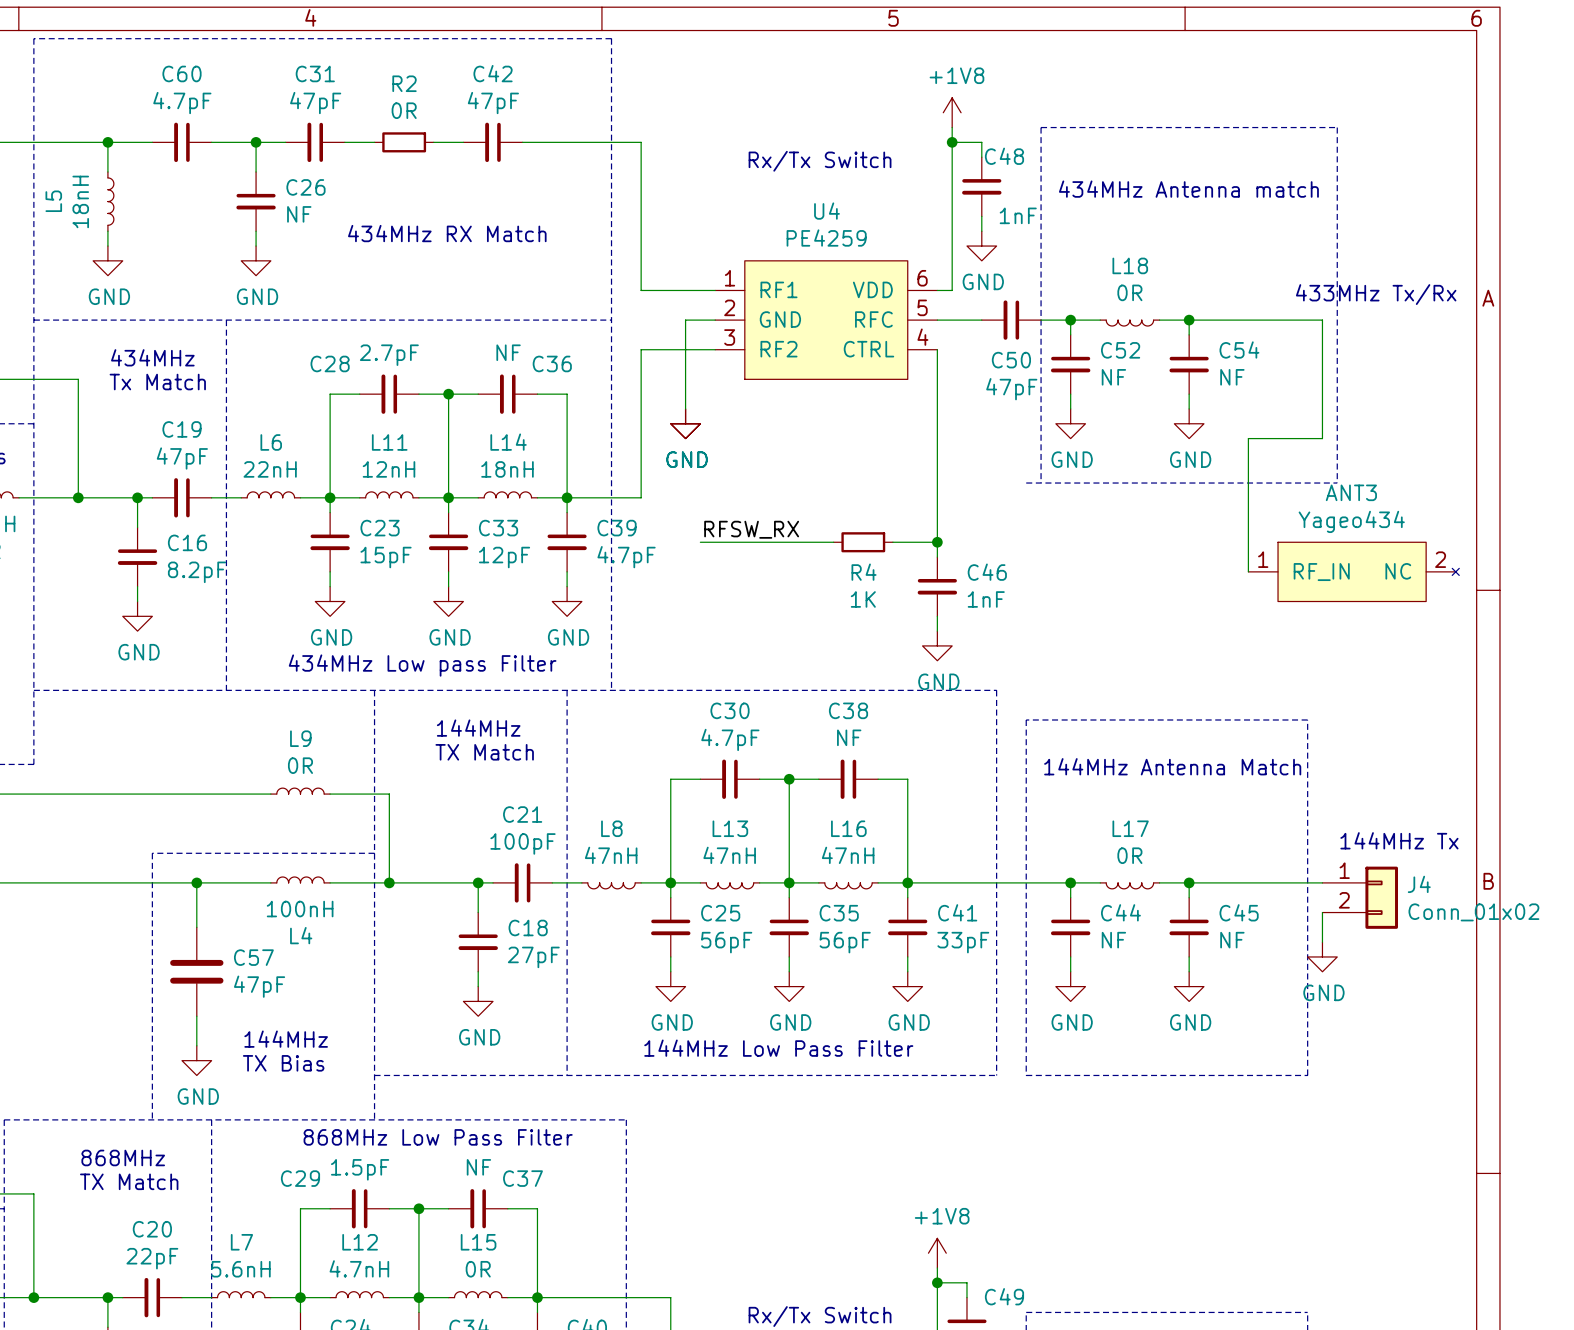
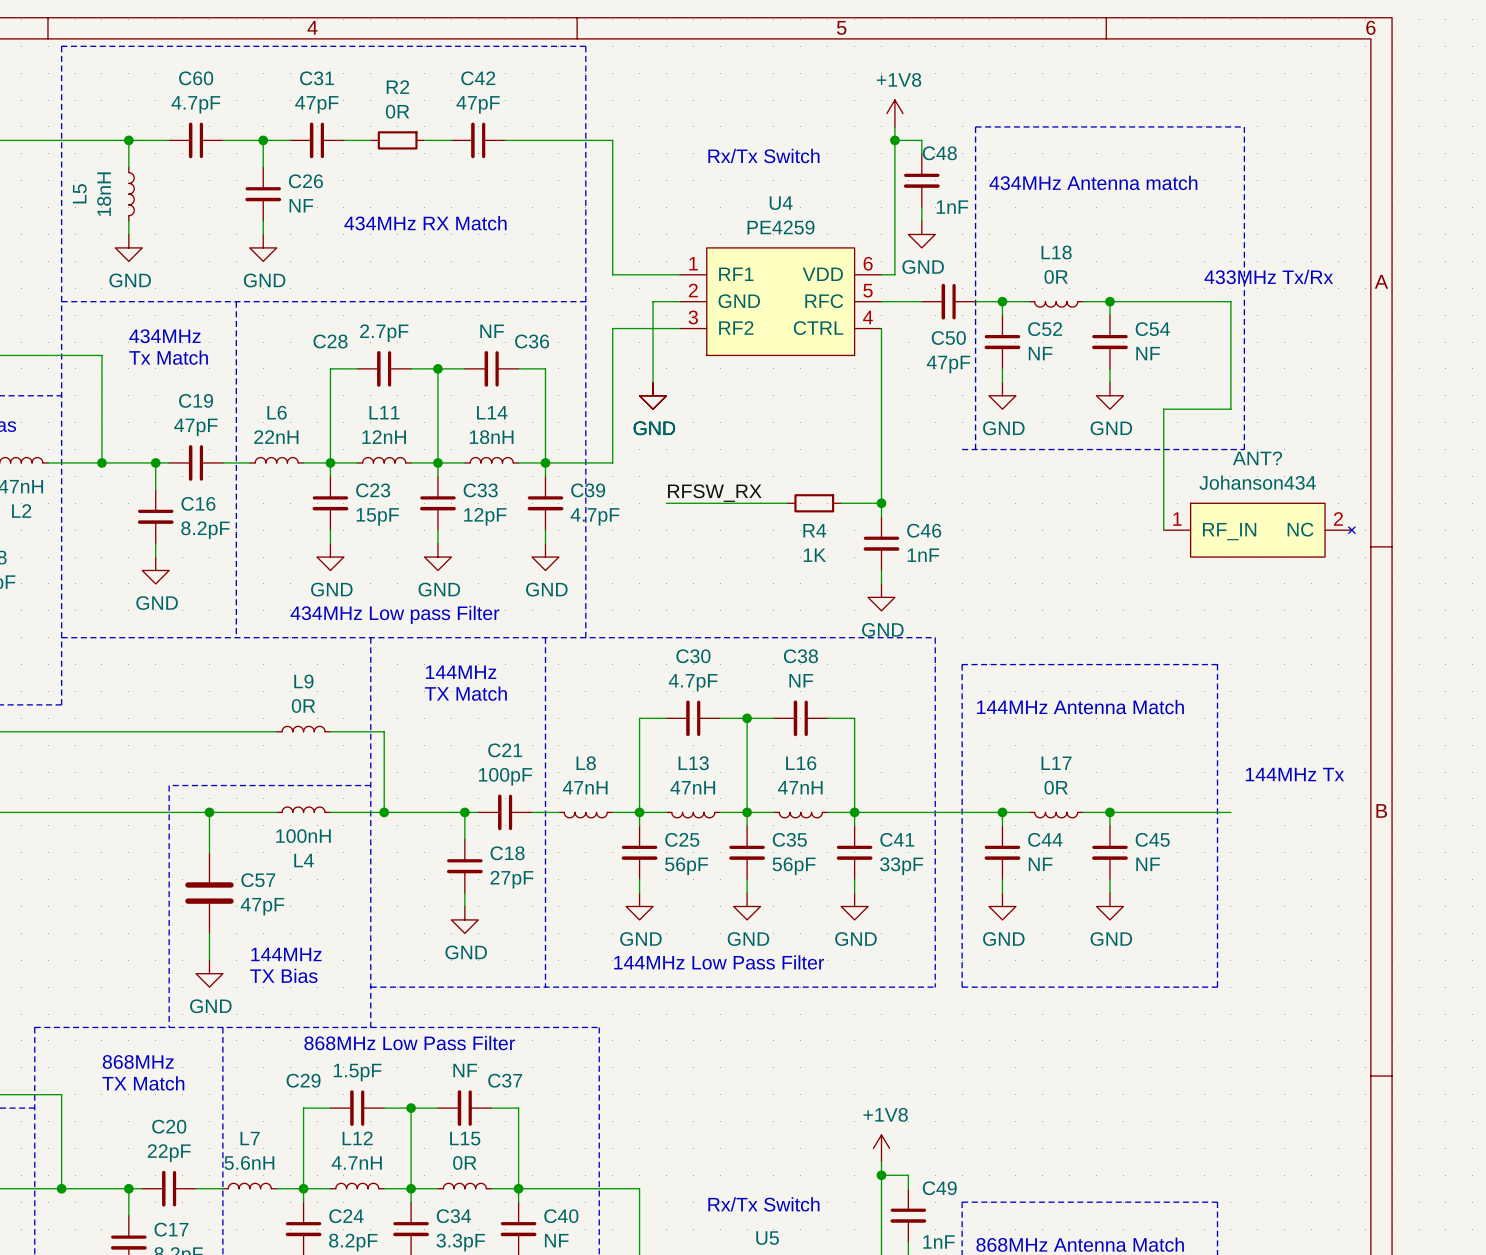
ANT3 name: ANT3 (1351, 492) -> ANT? (1257, 458)
ANT3 value: Yageo434 (1351, 521) -> Johanson434 (1257, 482)
J4: Conn_01x02 (1360, 897) -> none
wire: (1322, 912) (1322, 942) -> none
power symbol: GND (1322, 956) -> none

